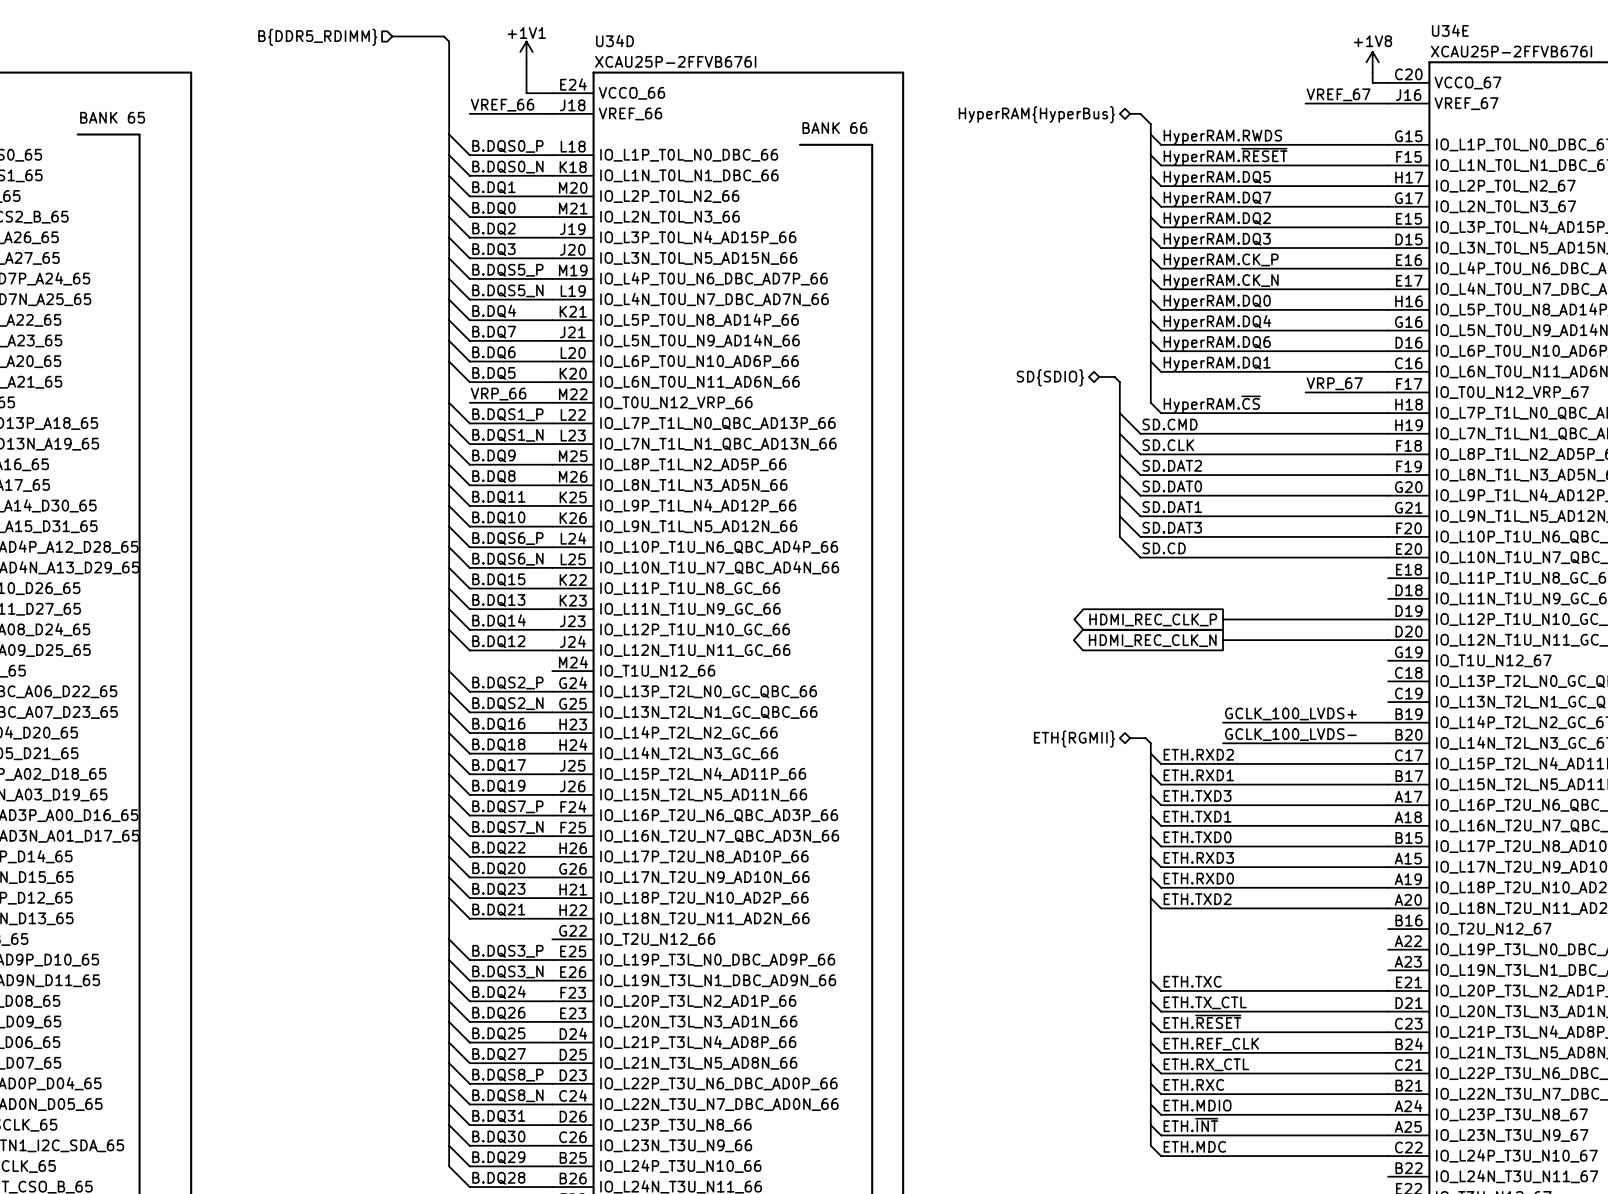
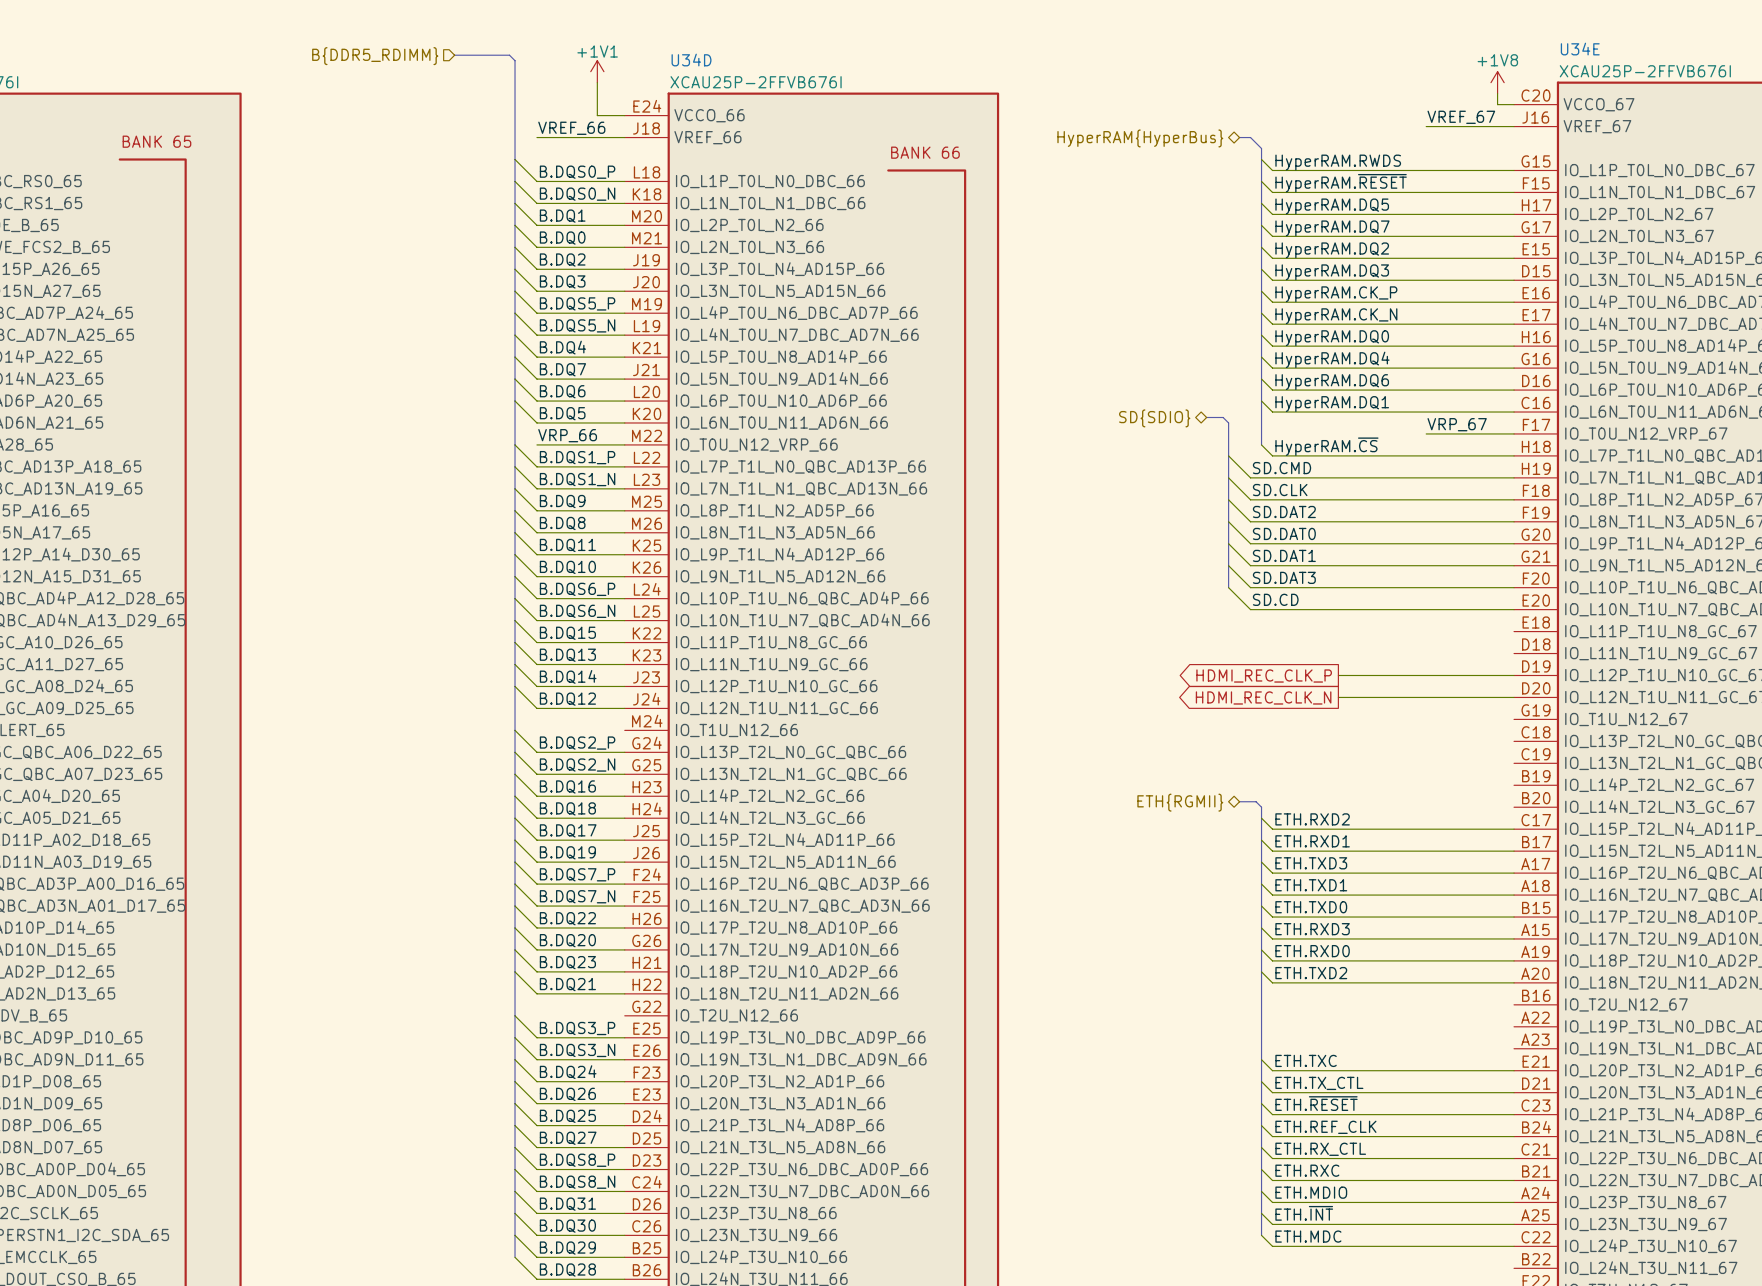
label: GCLK_100_LVDS+ (1290, 713) -> none
wire: (1223, 722) (1388, 722) -> none
label: GCLK_100_LVDS- (1290, 734) -> none
wire: (1223, 743) (1388, 743) -> none

